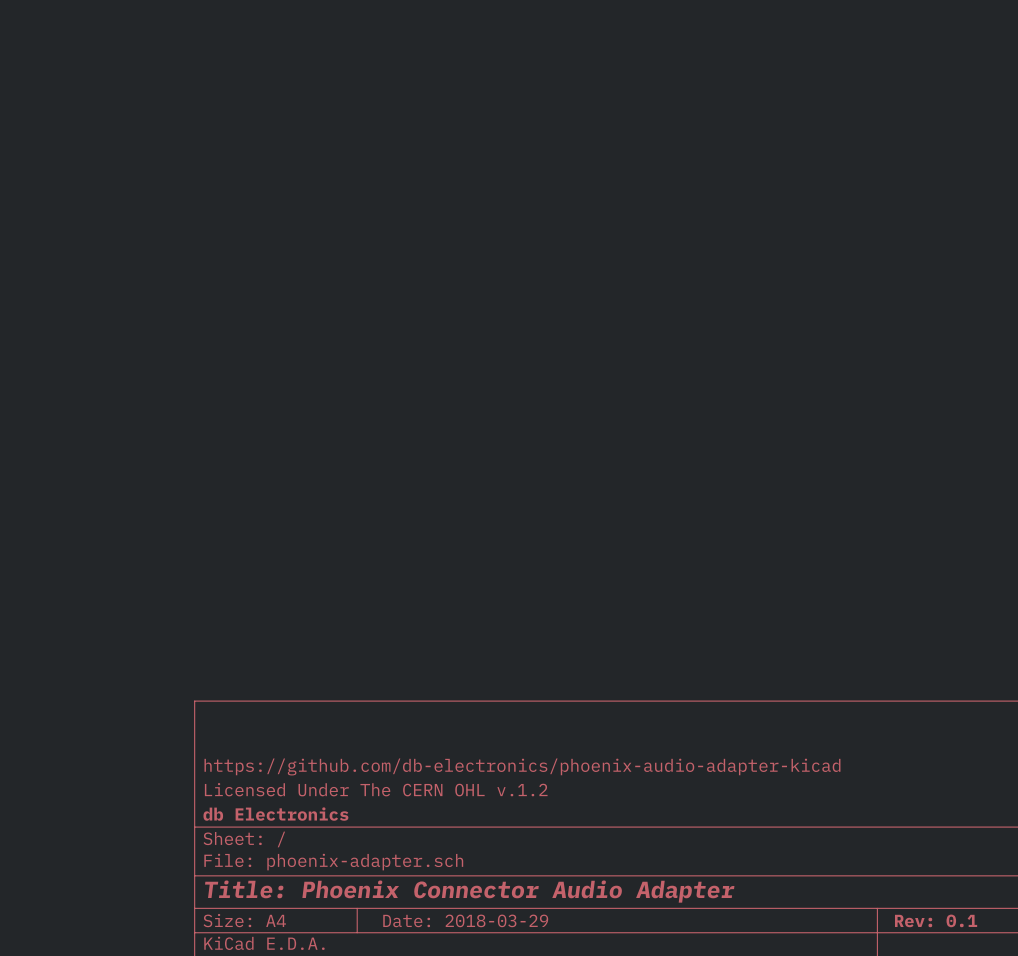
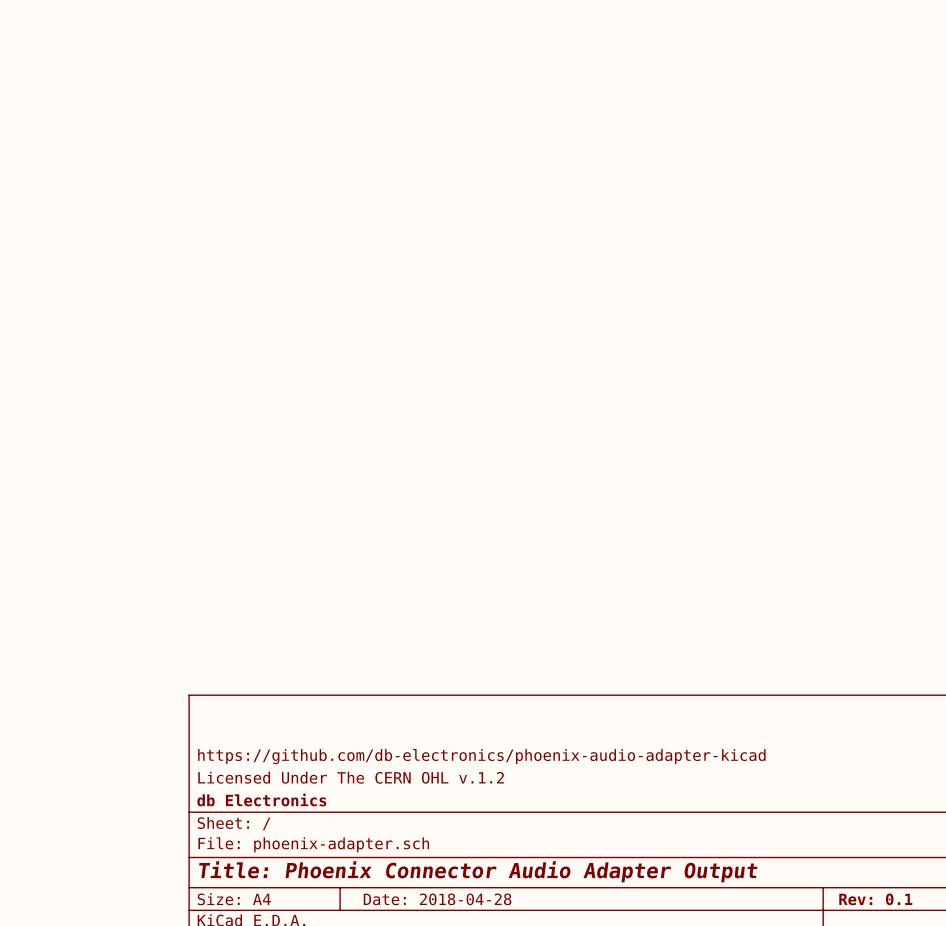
title block: Title: Phoenix Connector Audio Adapter (469, 891) -> Title: Phoenix Connector Audio Adapter Output (478, 871)
title block: Date: 2018-03-29 (465, 920) -> Date: 2018-04-28 (437, 899)

